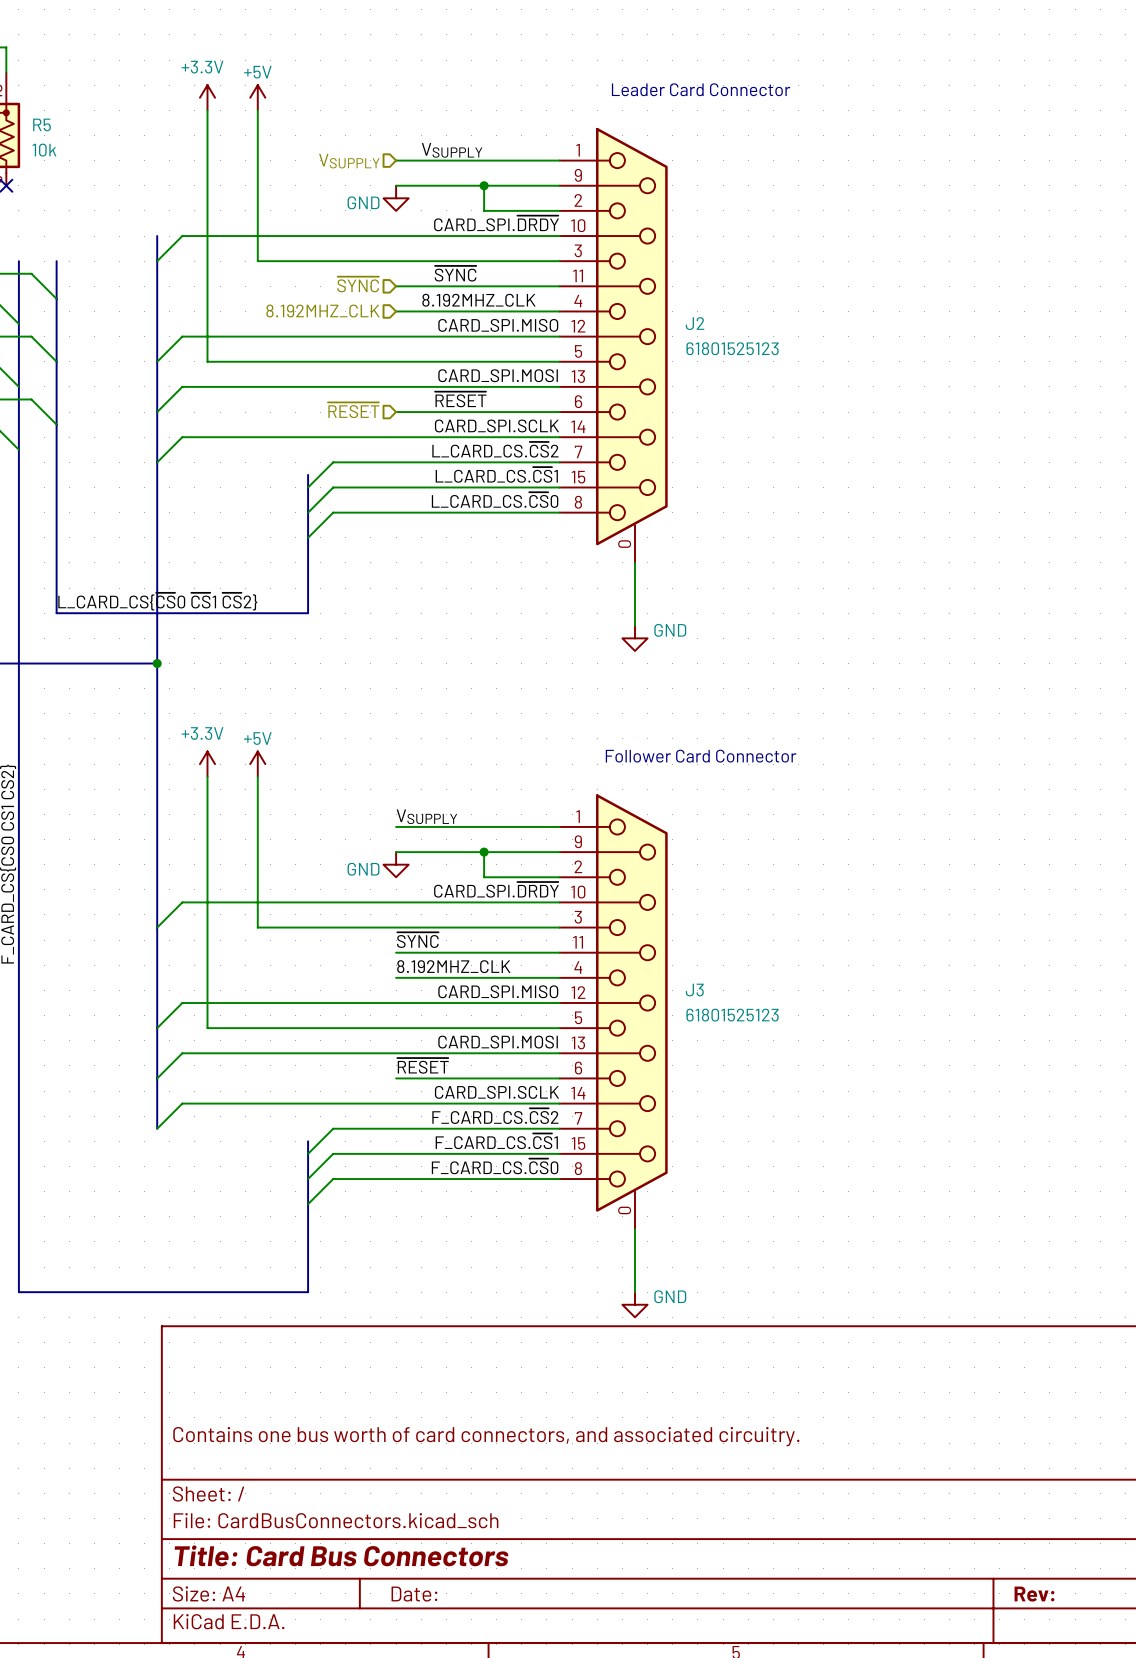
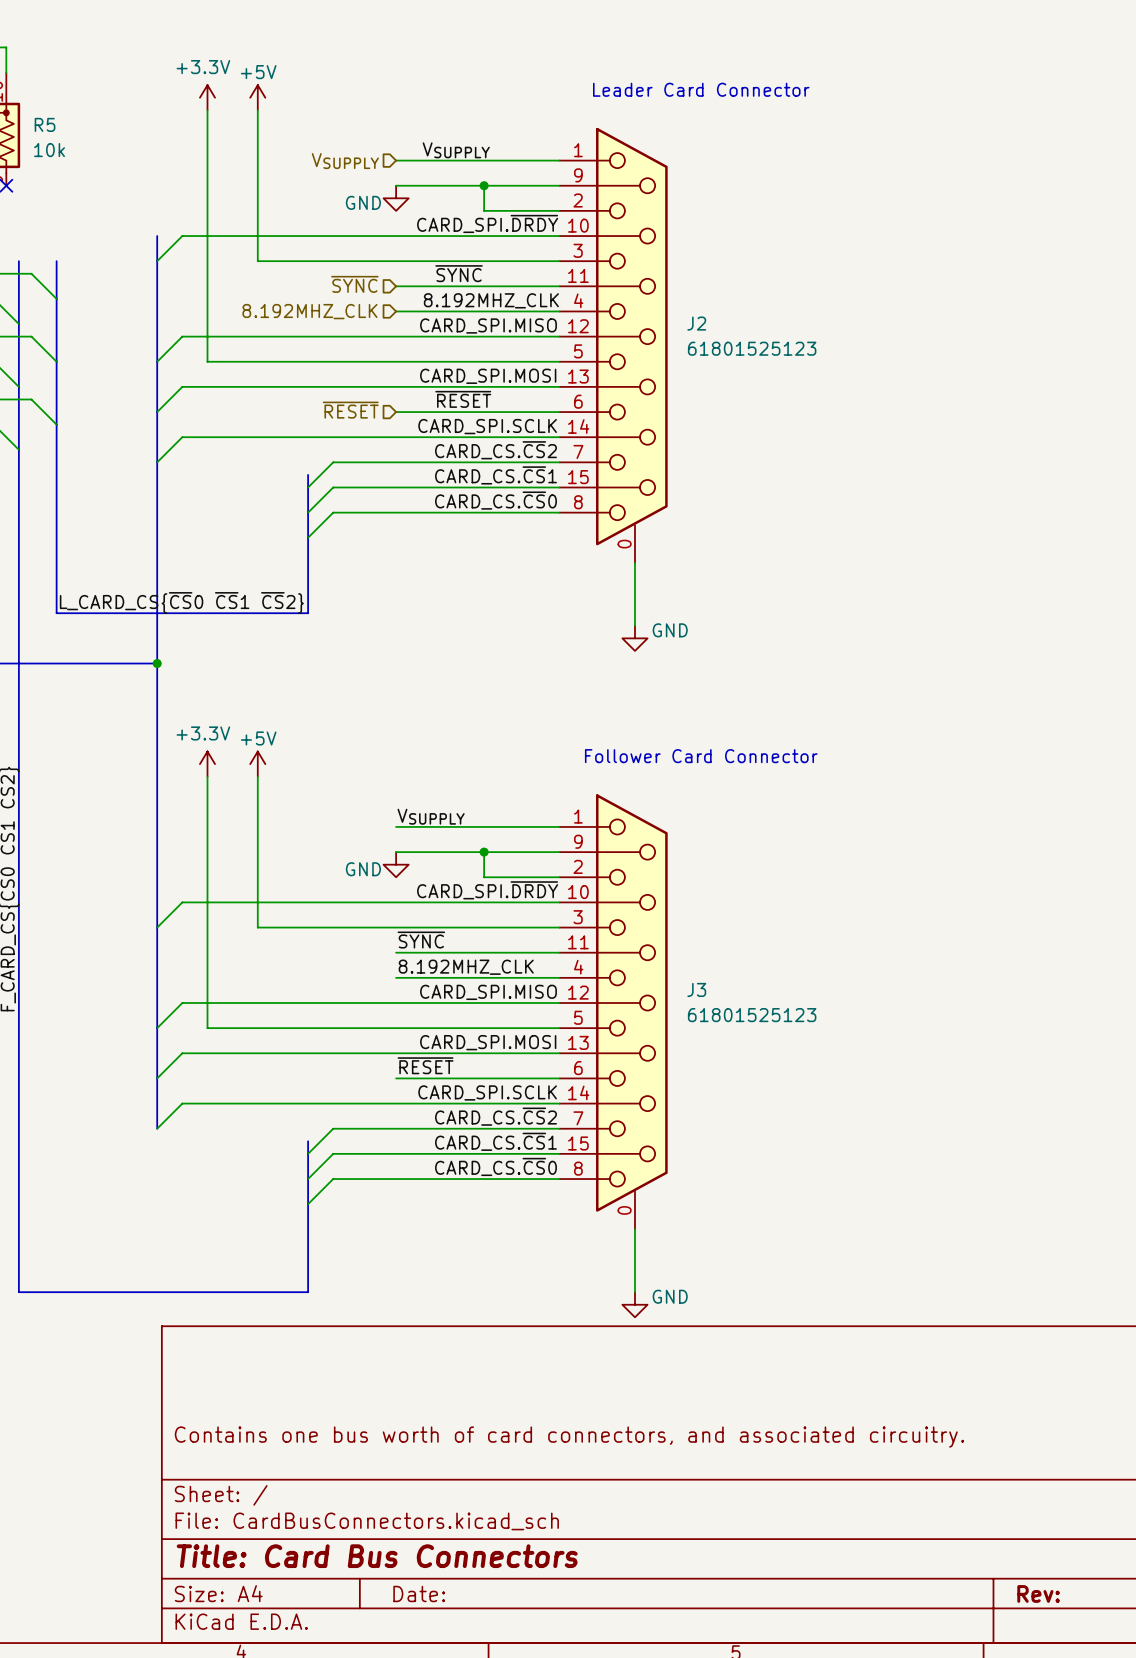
label: L_CARD_CS.~{CS}2 (495, 449) -> CARD_CS.~{CS}2 (495, 450)
label: L_CARD_CS.~{CS}1 (496, 474) -> CARD_CS.~{CS}1 (495, 475)
label: L_CARD_CS.~{CS}0 (495, 500) -> CARD_CS.~{CS}0 (495, 500)
label: F_CARD_CS.~{CS}2 (495, 1116) -> CARD_CS.~{CS}2 (495, 1116)
label: F_CARD_CS.~{CS}1 (496, 1141) -> CARD_CS.~{CS}1 (495, 1141)
label: F_CARD_CS.~{CS}0 (495, 1166) -> CARD_CS.~{CS}0 (495, 1166)

